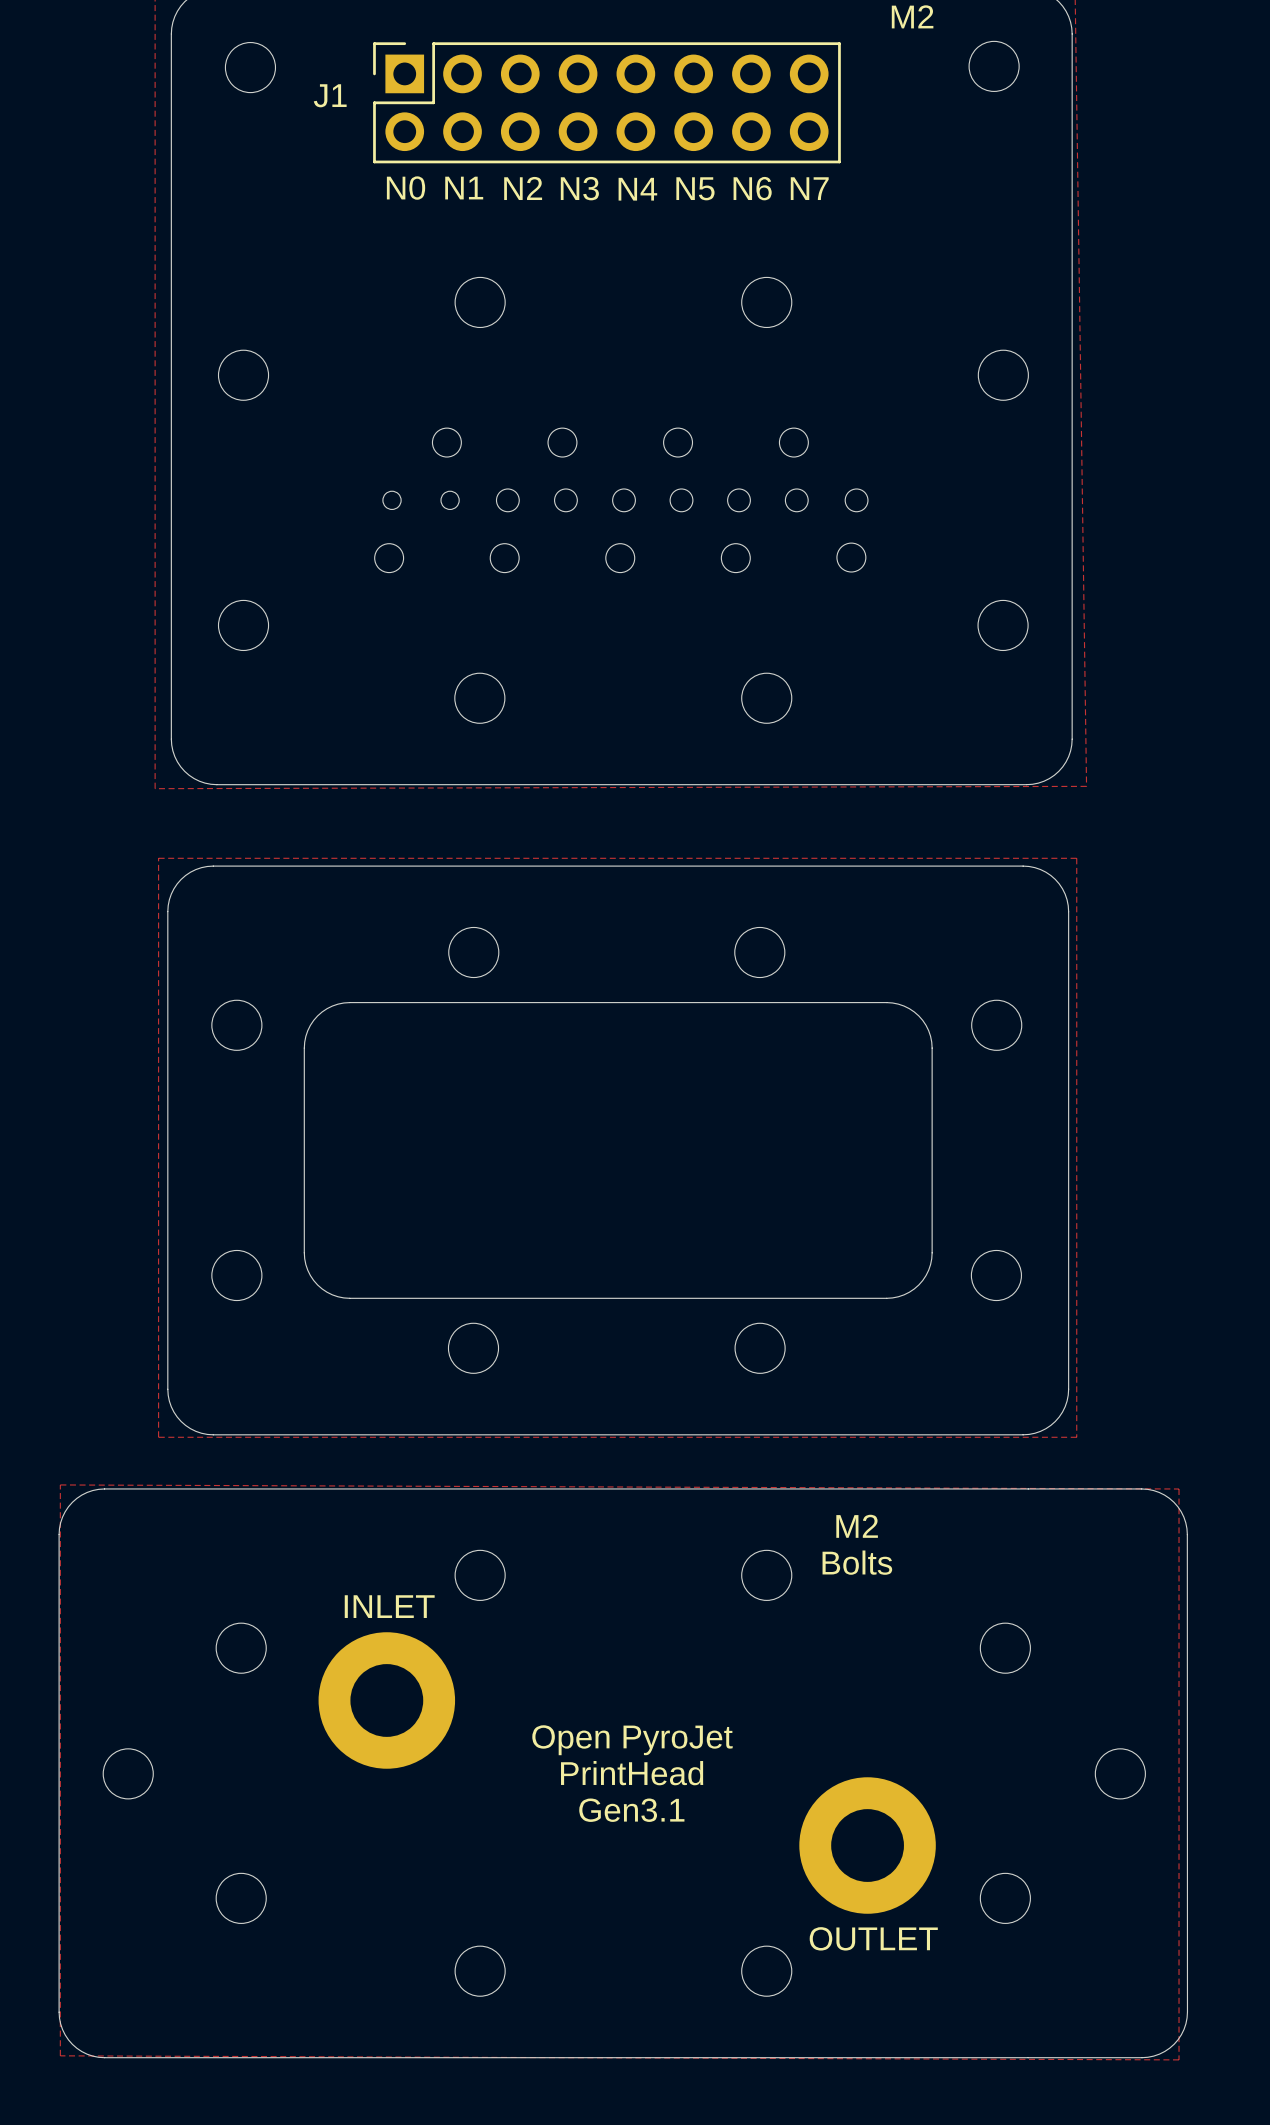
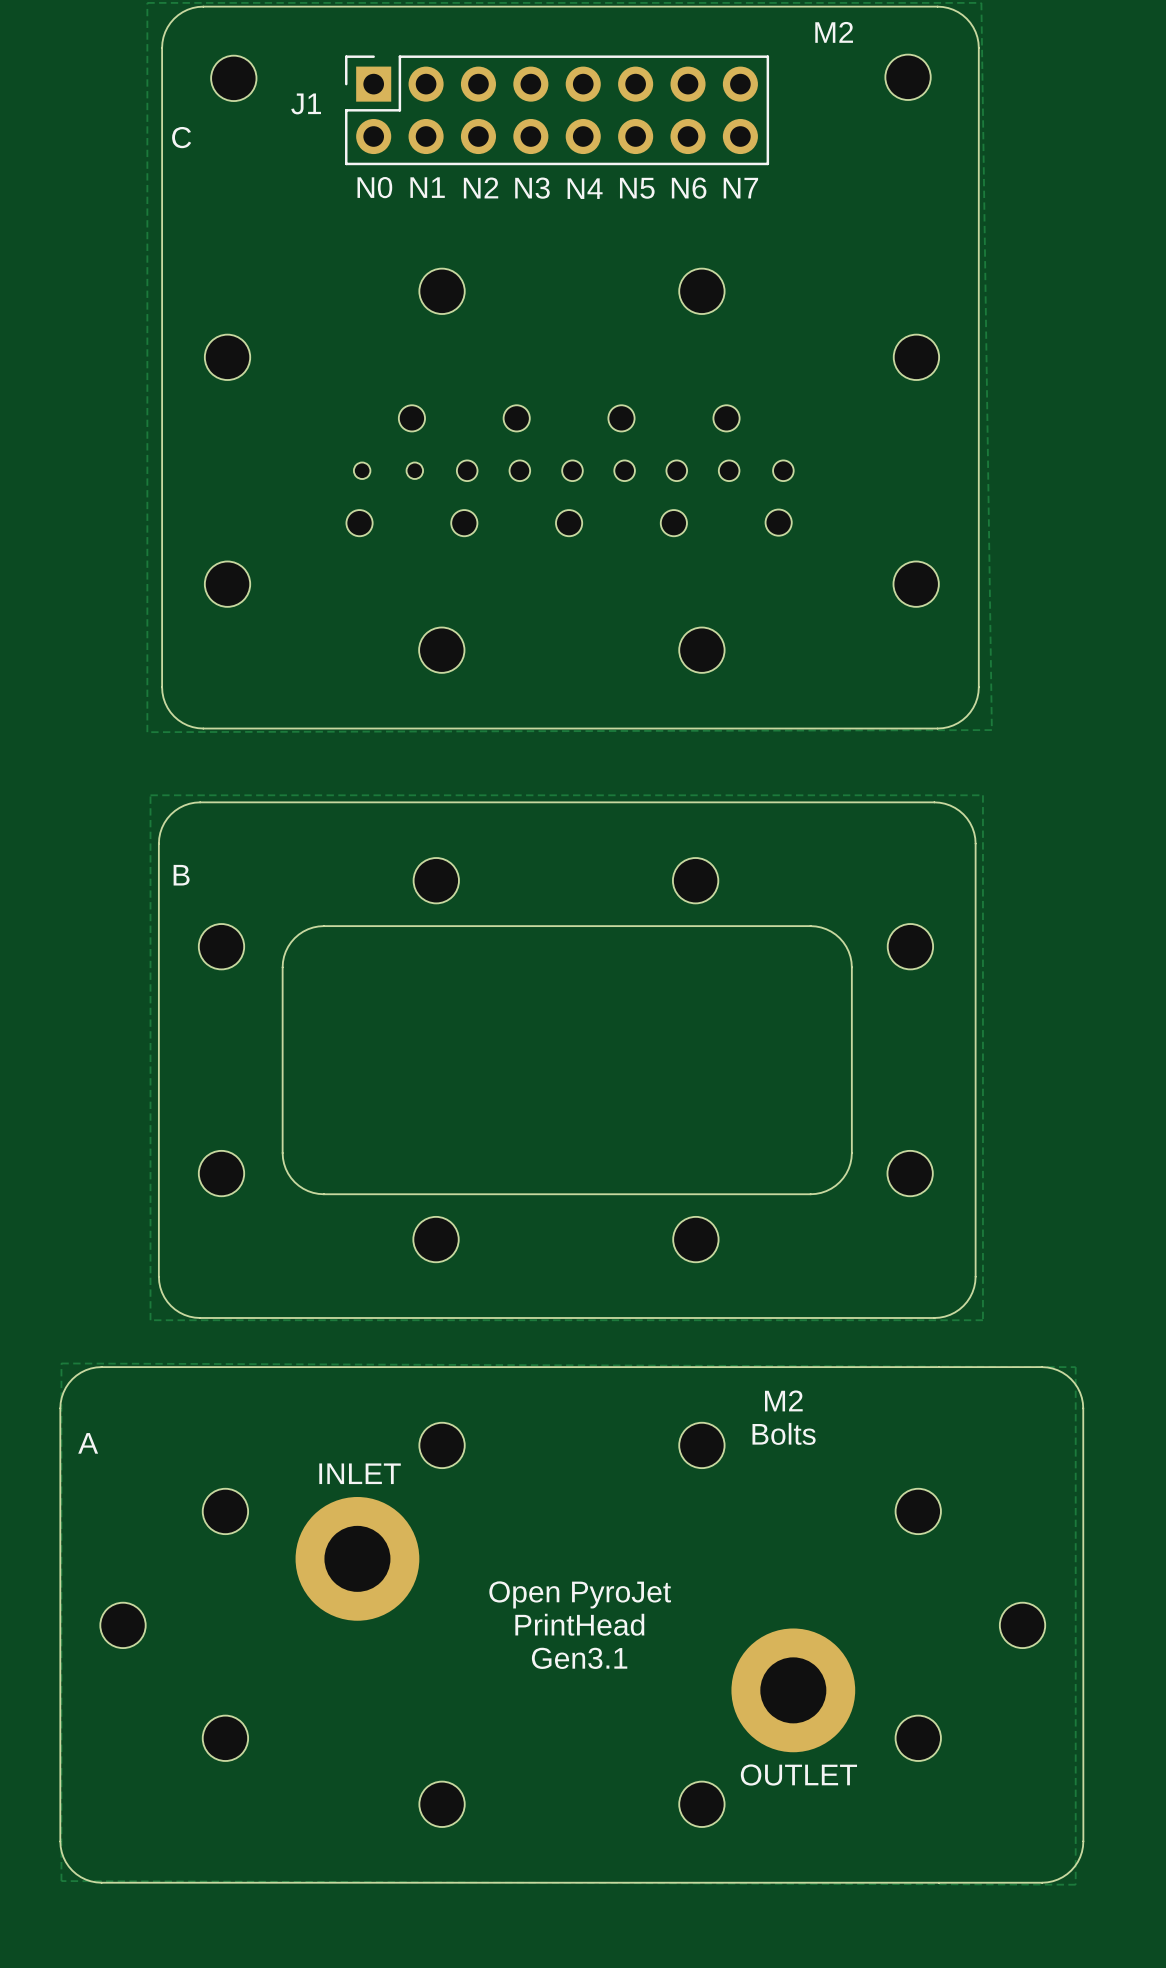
text: none -> C (181, 137)
text: none -> B (181, 875)
text: none -> A (88, 1443)

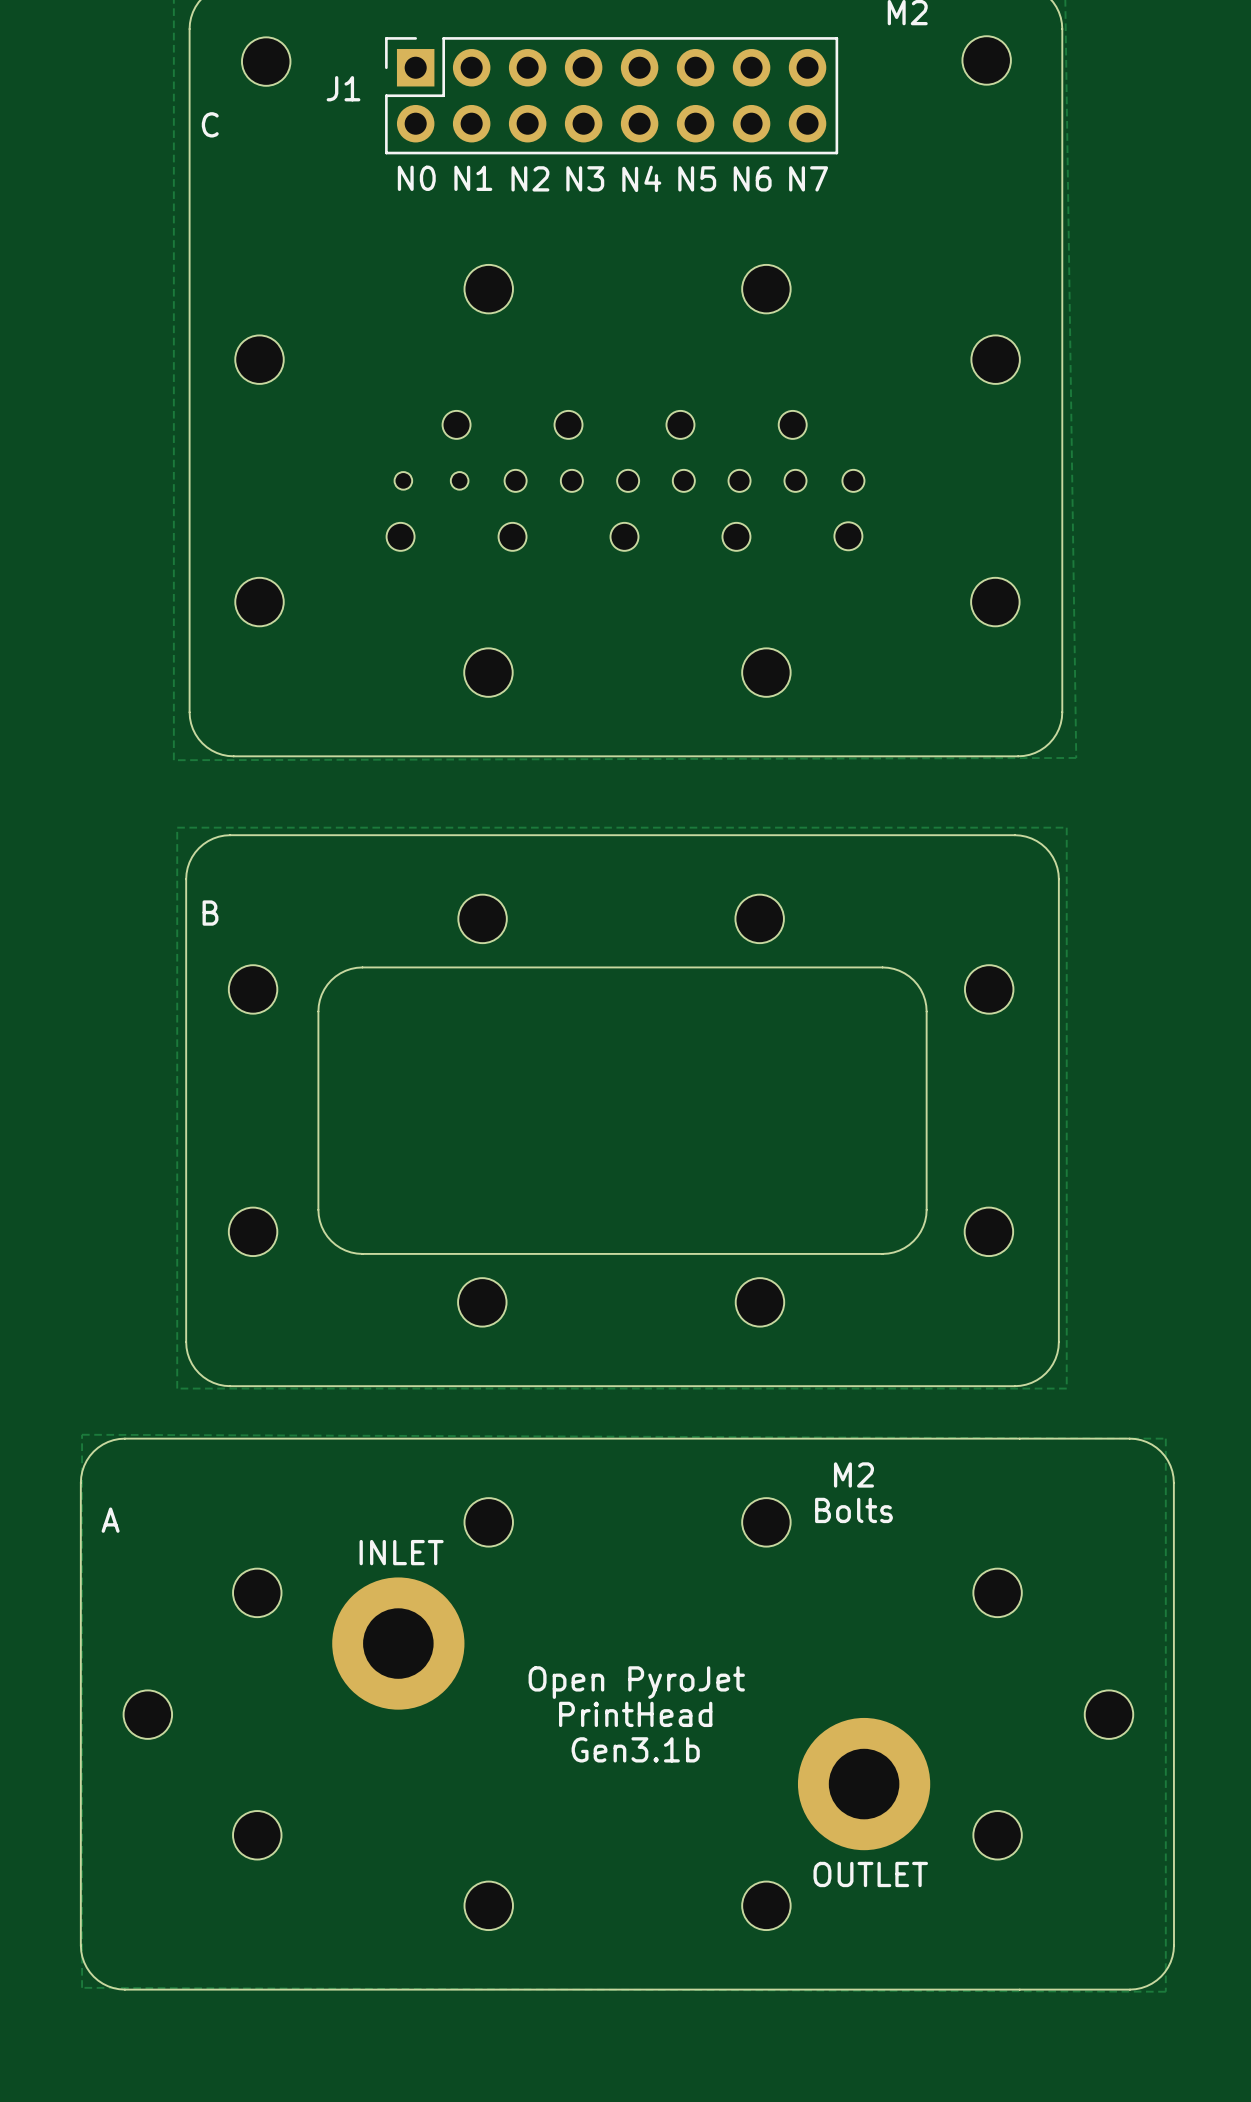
text: Gen3.1 (579, 1658) -> Gen3.1b (635, 1749)

